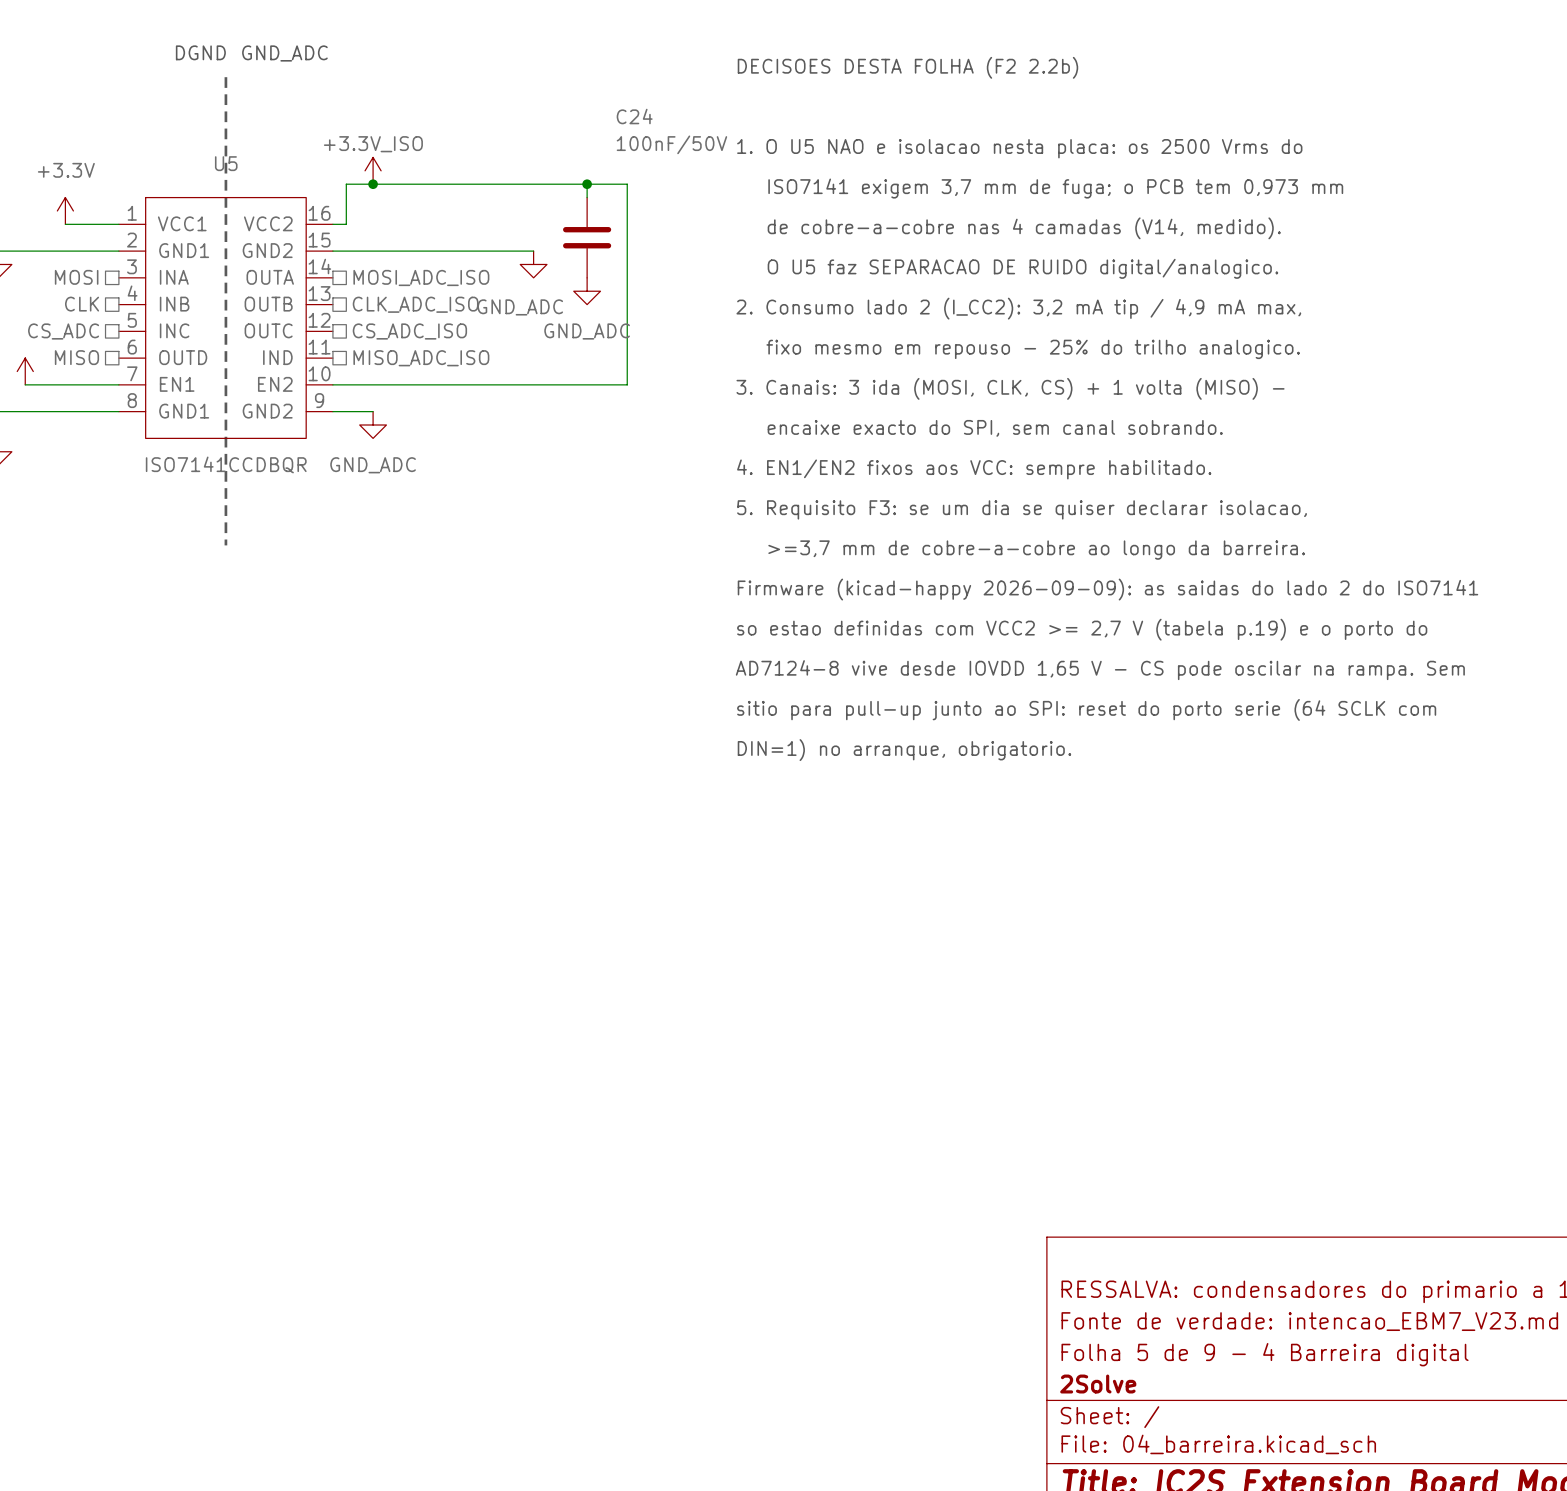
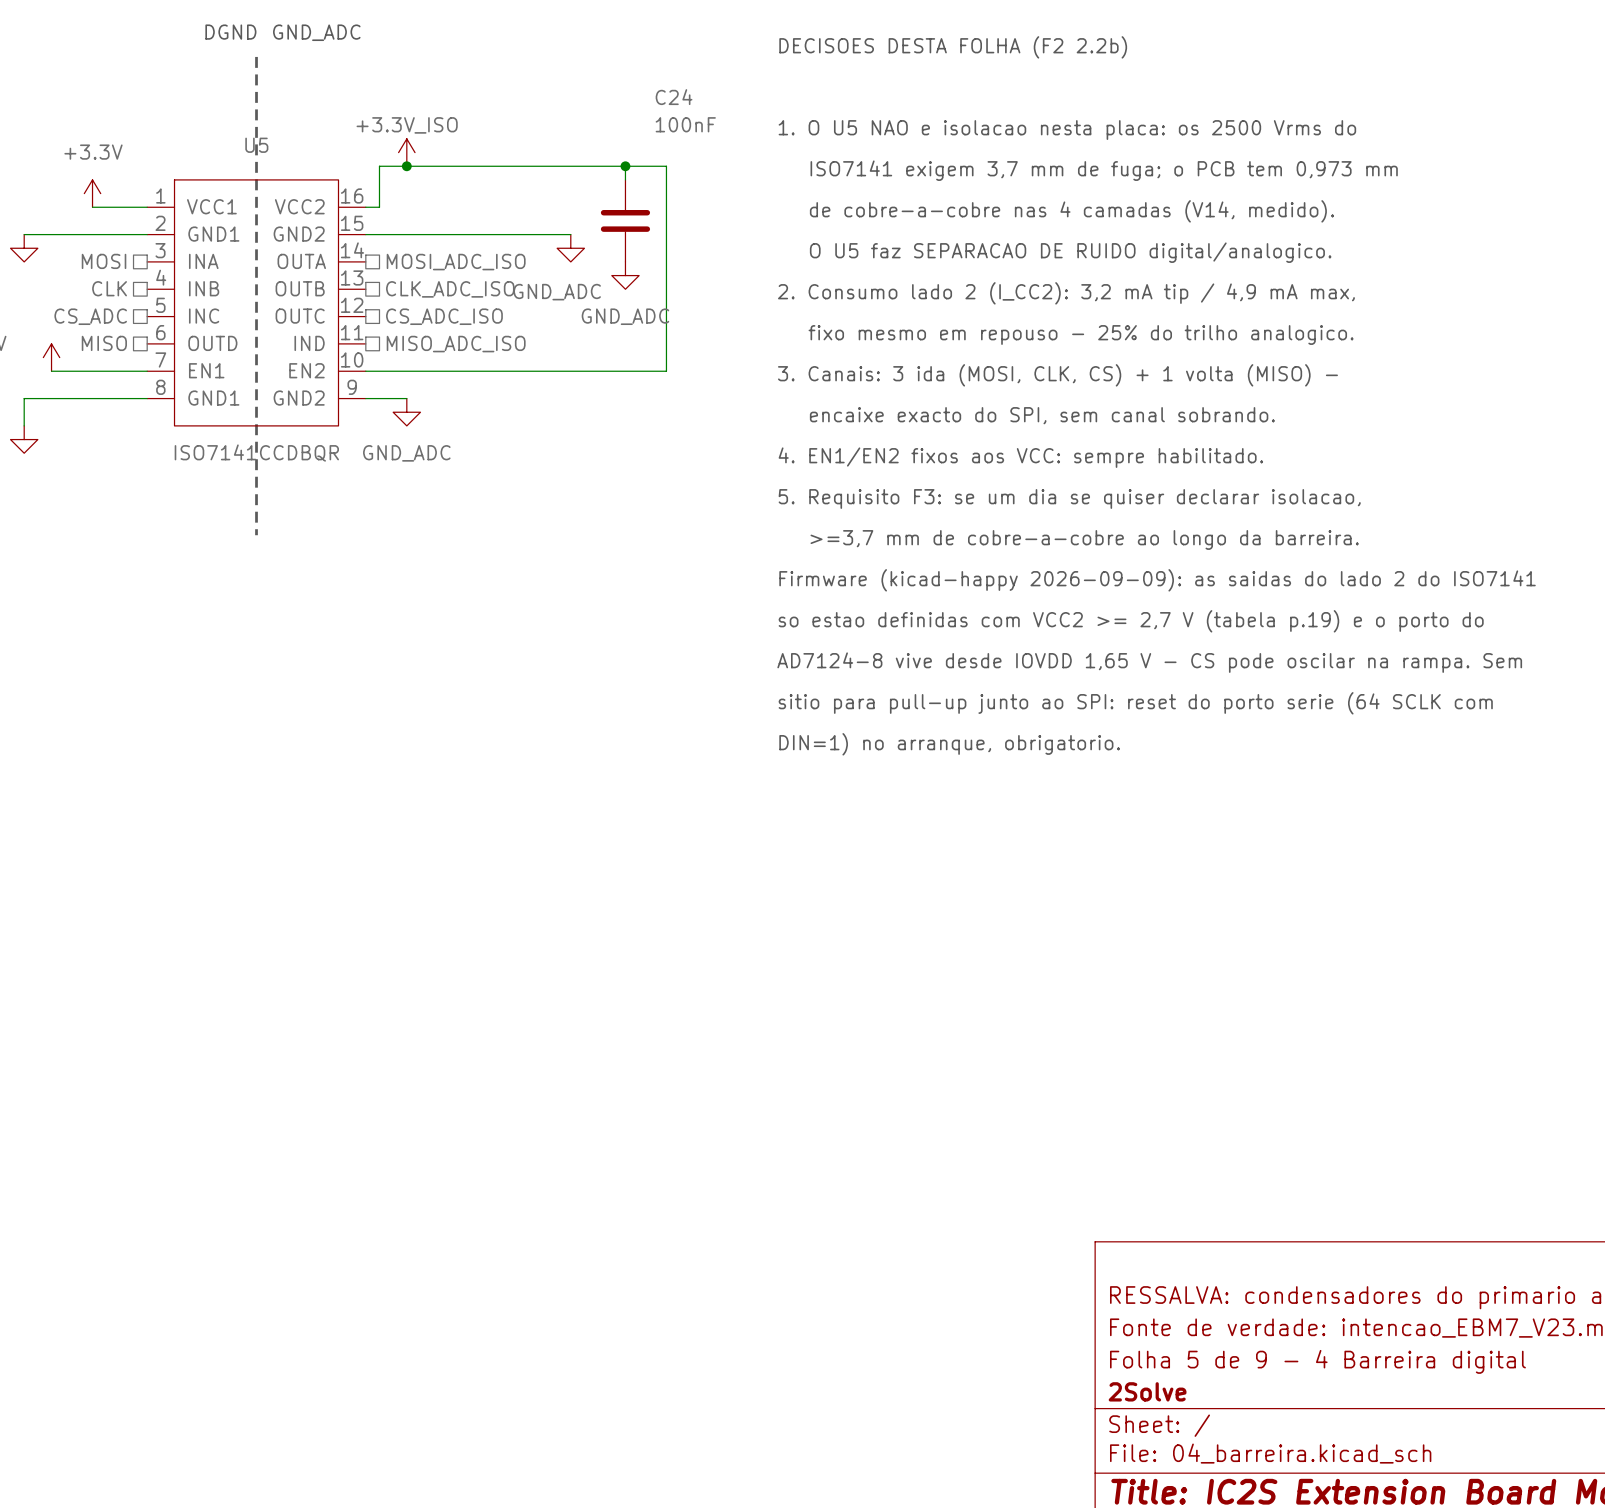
C24 value: 100nF/50V (671, 144) -> 100nF (685, 124)

